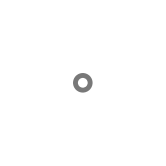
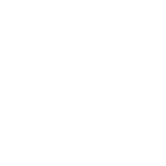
via: (82, 82) -> none

